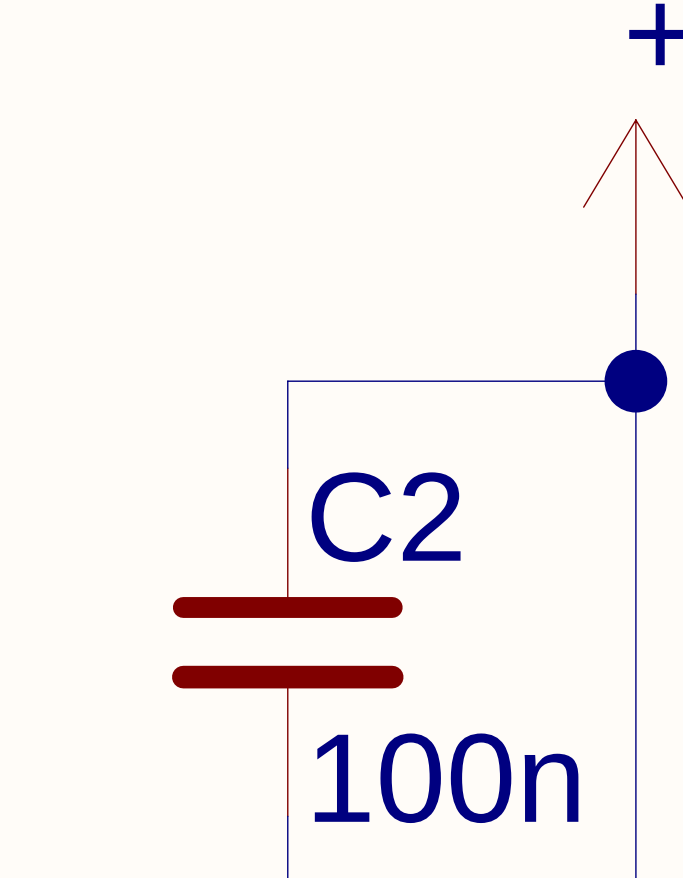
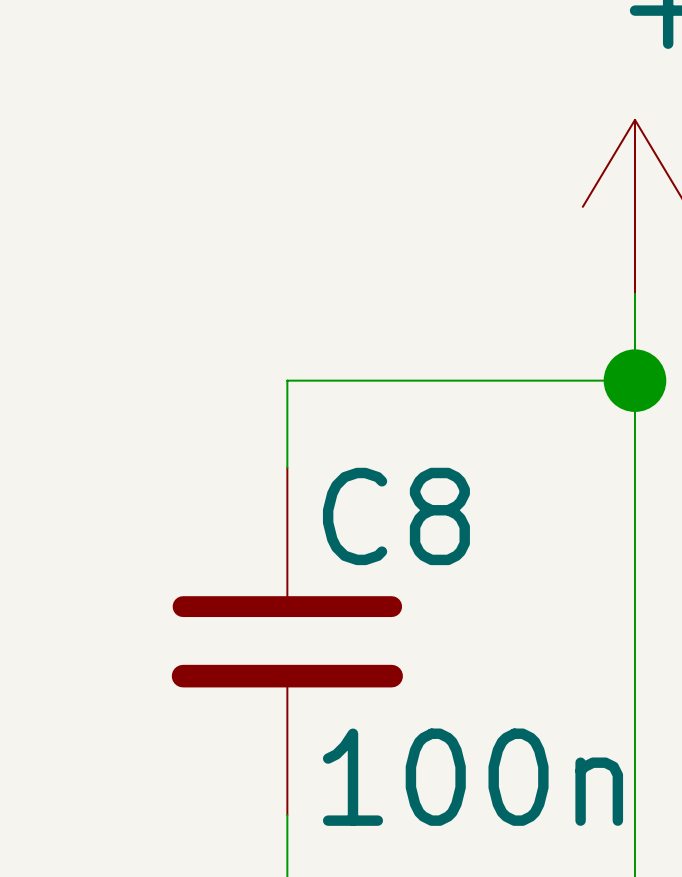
C2 name: C2 (386, 517) -> C8 (396, 516)

